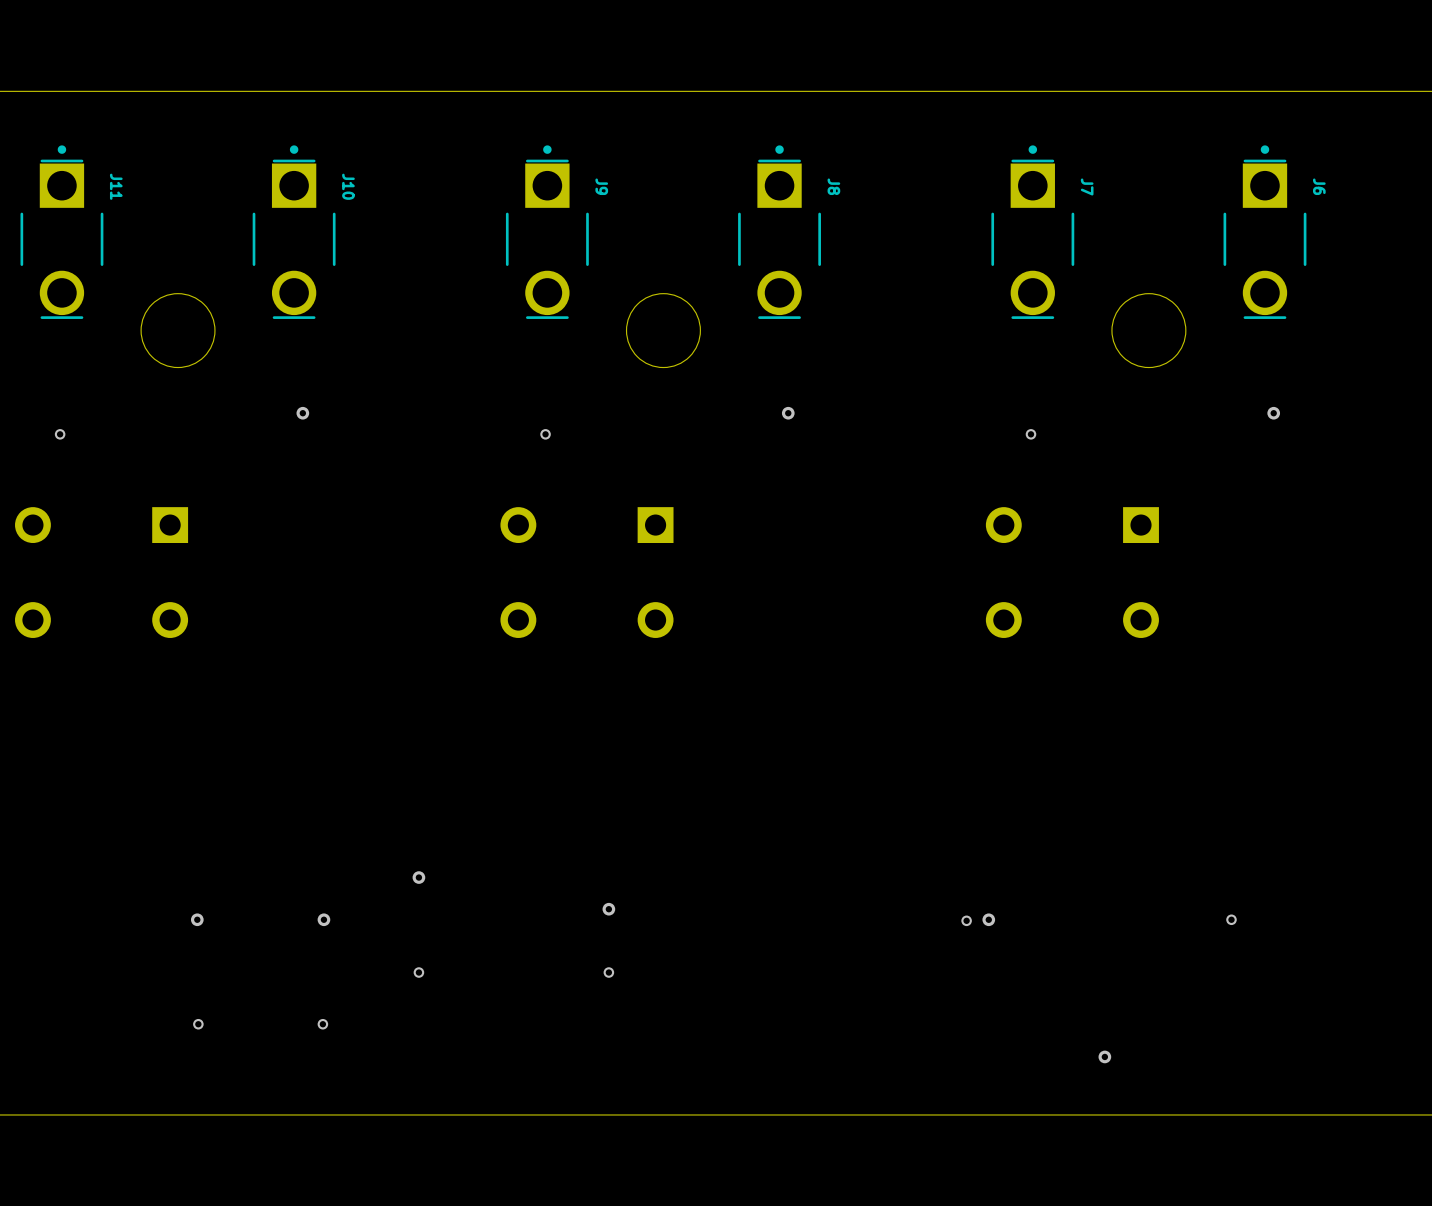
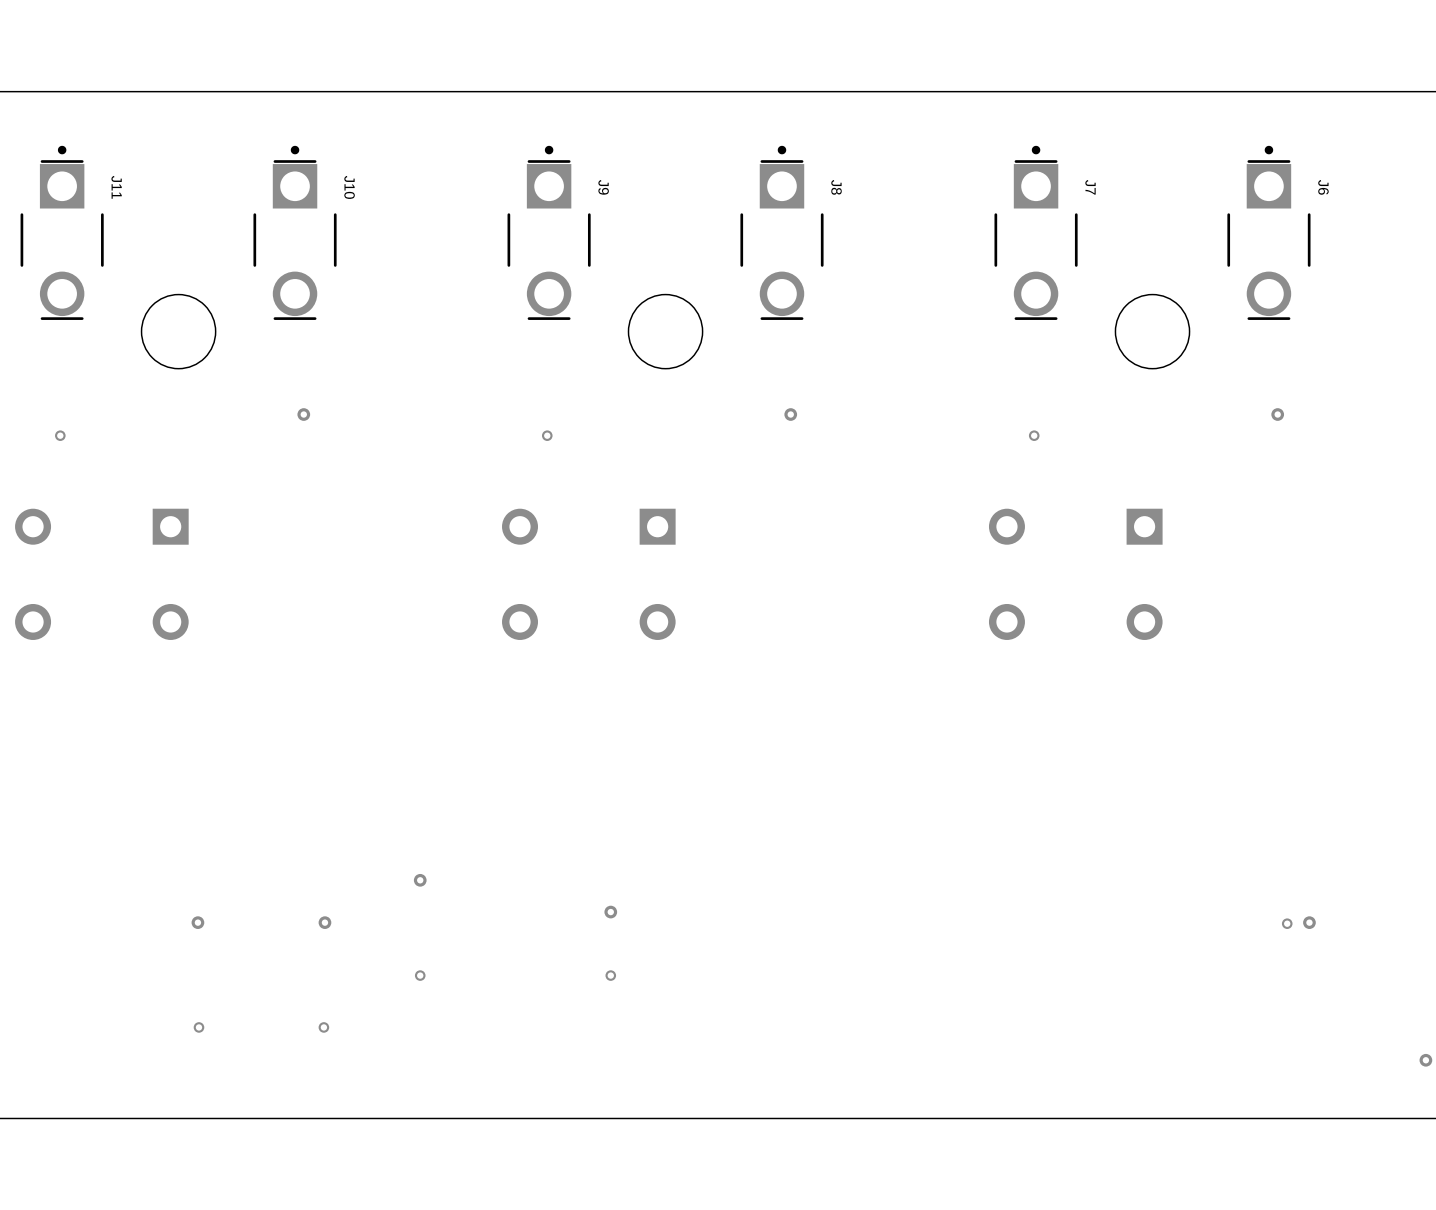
via: (988, 919) -> none
via position: (1231, 919) -> (1287, 923)
via: none -> (1309, 922)
via: (966, 920) -> none
via: (1104, 1056) -> none
via: none -> (1425, 1060)

